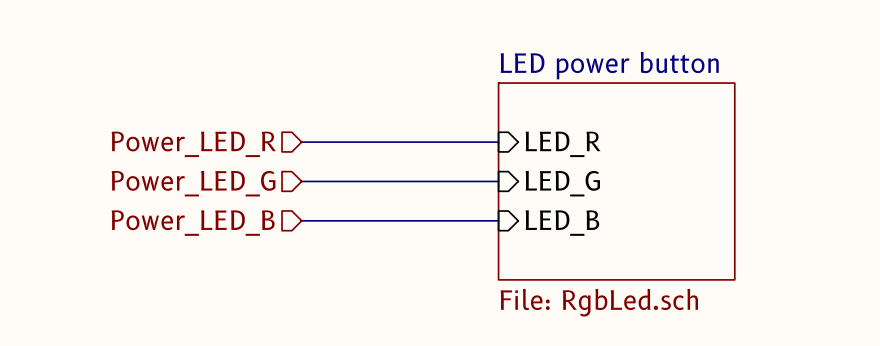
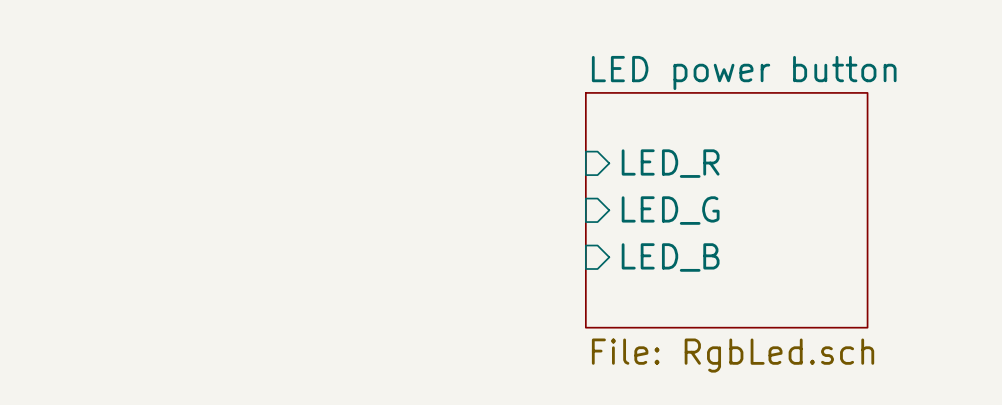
wire: (301, 142) (498, 142) -> none
hierarchical label: Power_LED_R (193, 144) -> none
wire: (301, 181) (498, 181) -> none
hierarchical label: Power_LED_G (193, 183) -> none
wire: (301, 220) (498, 220) -> none
hierarchical label: Power_LED_B (193, 223) -> none

